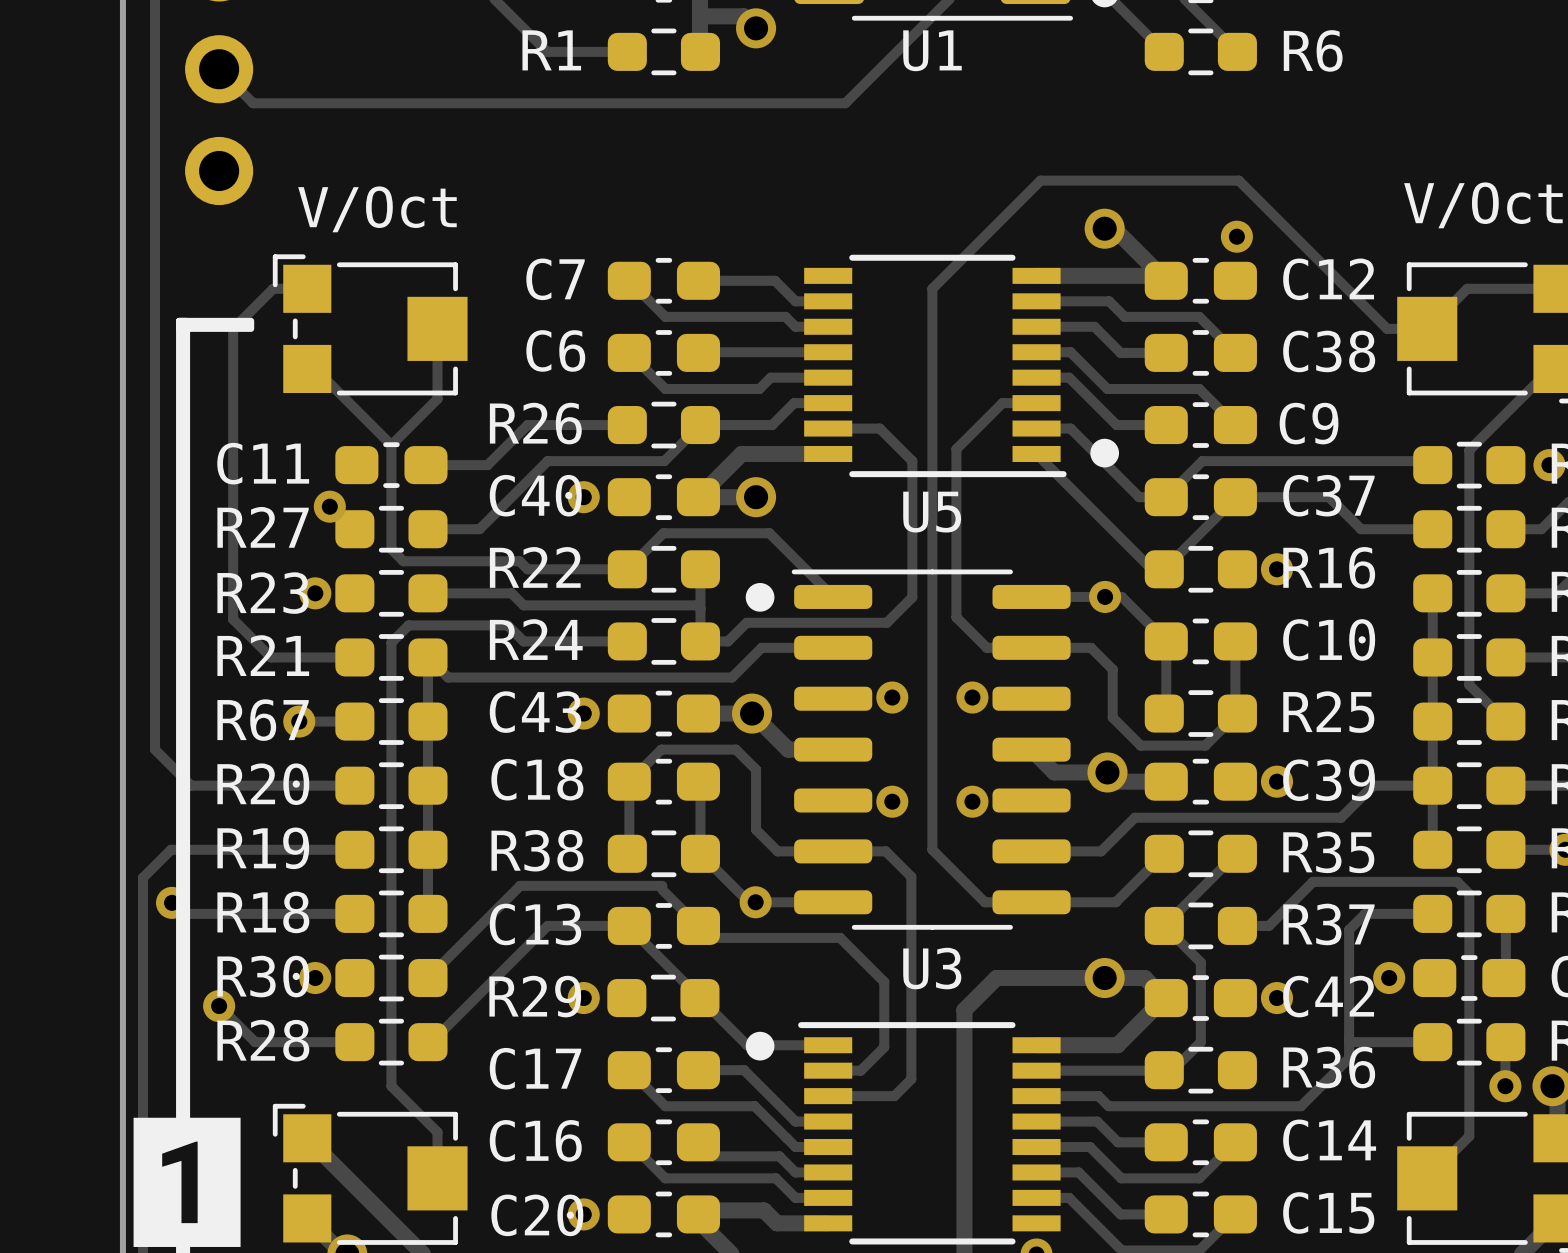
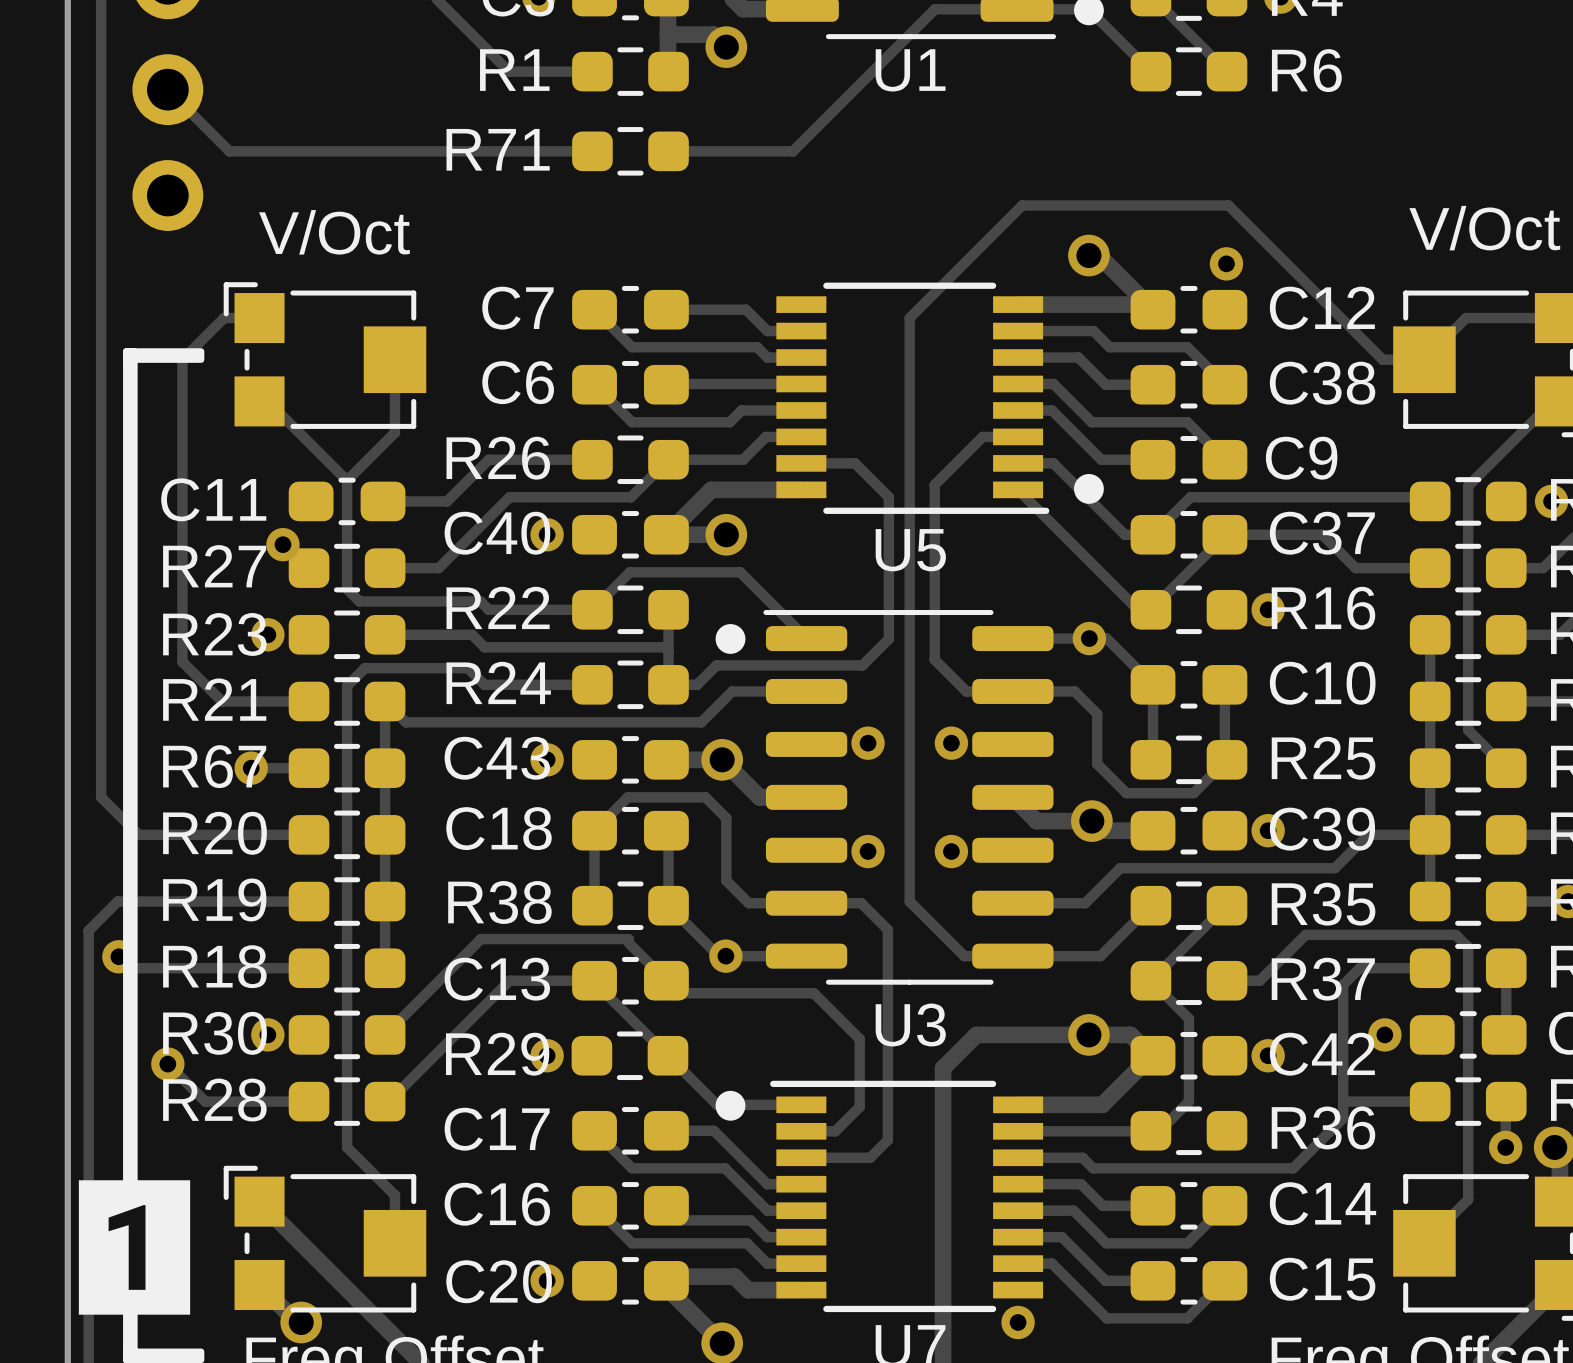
track: (253, 103) (845, 103) -> (203, 125) (229, 151) (592, 151)
track: none -> (819, 125) (793, 151) (668, 151)
R71: none -> (630, 151)

